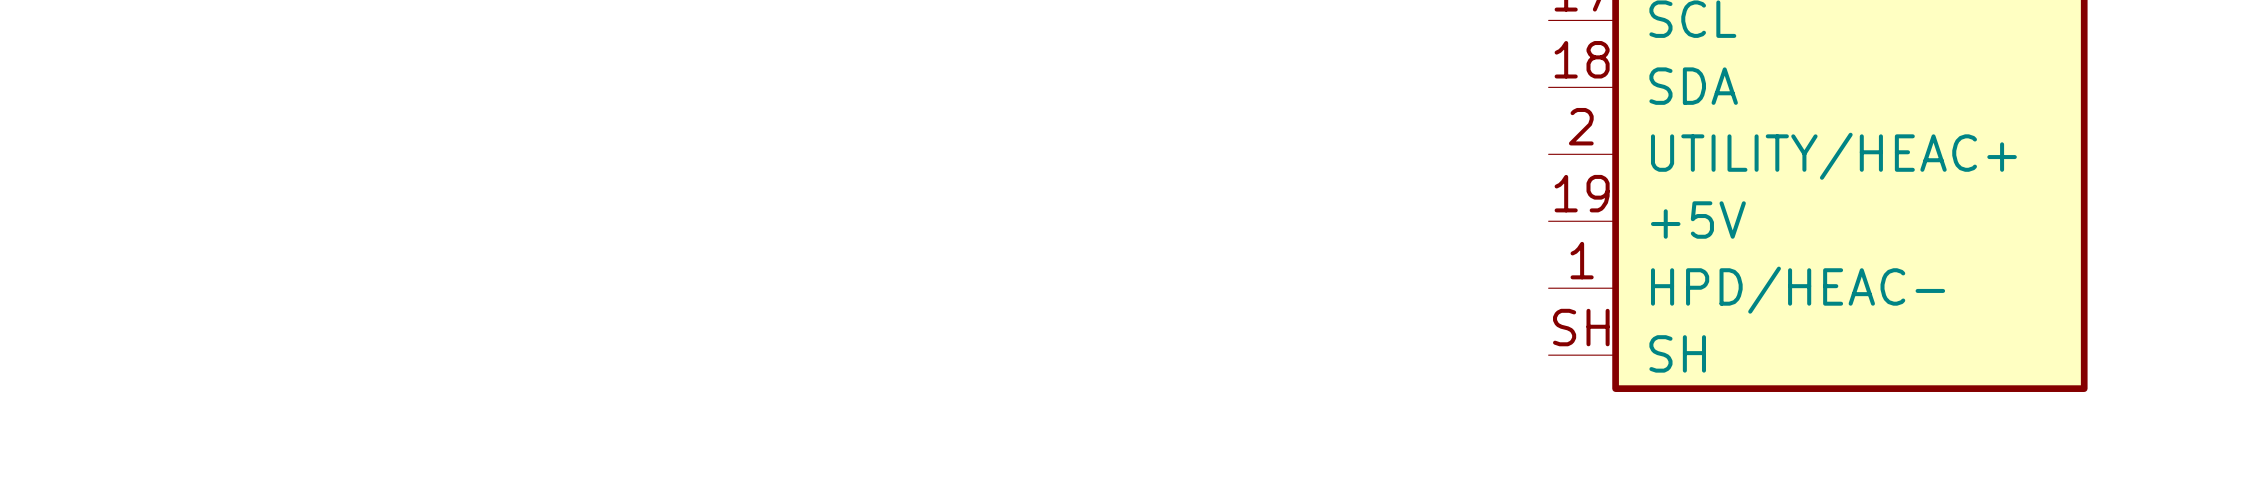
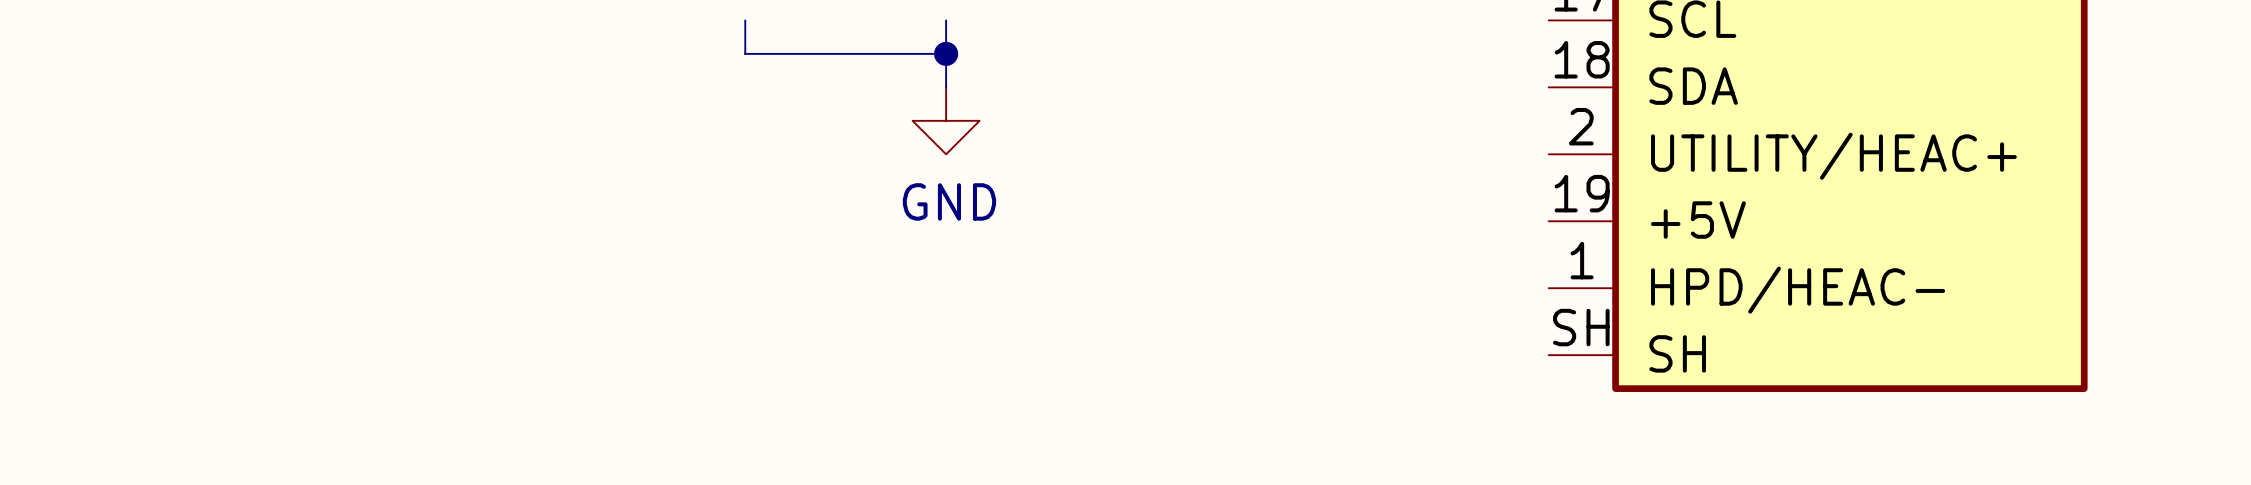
wire: none -> (745, 20) (745, 53) (946, 53)
wire: none -> (946, 20) (946, 87)
junction: none -> (946, 53)
power symbol: none -> GND (946, 120)

